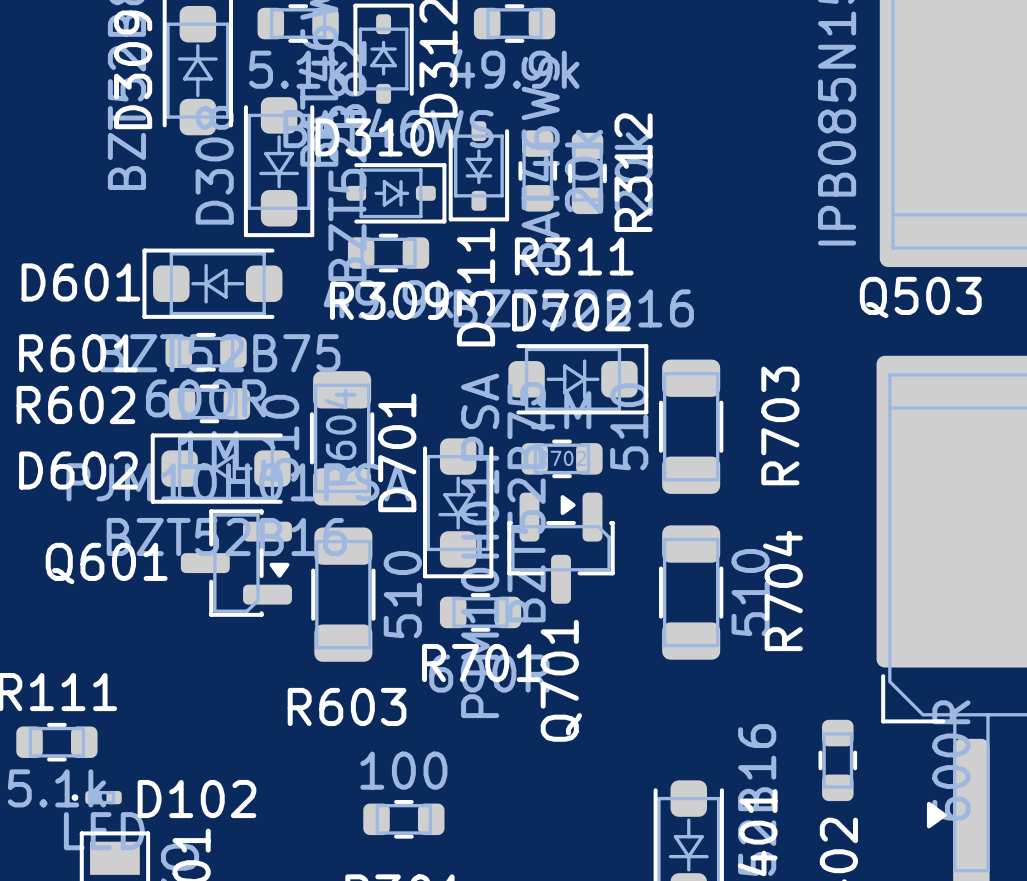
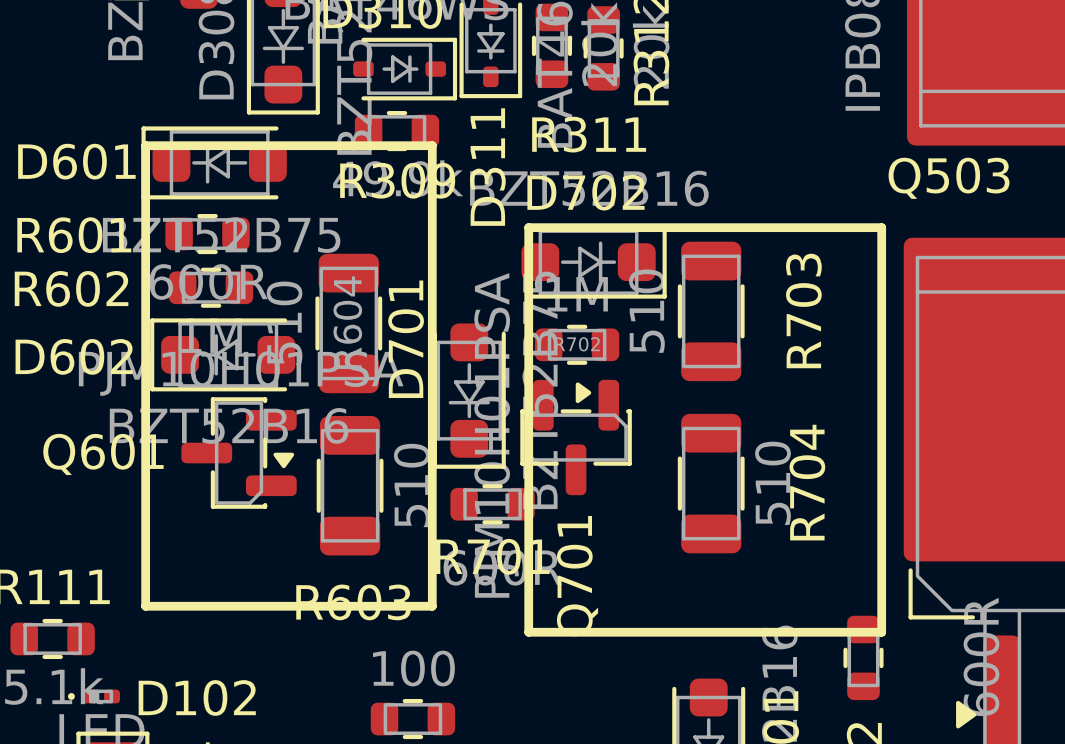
line: none -> (145, 145) (432, 145) (432, 606) (145, 606) (145, 145)
line: none -> (528, 227) (881, 227) (881, 632) (528, 632) (528, 227)

